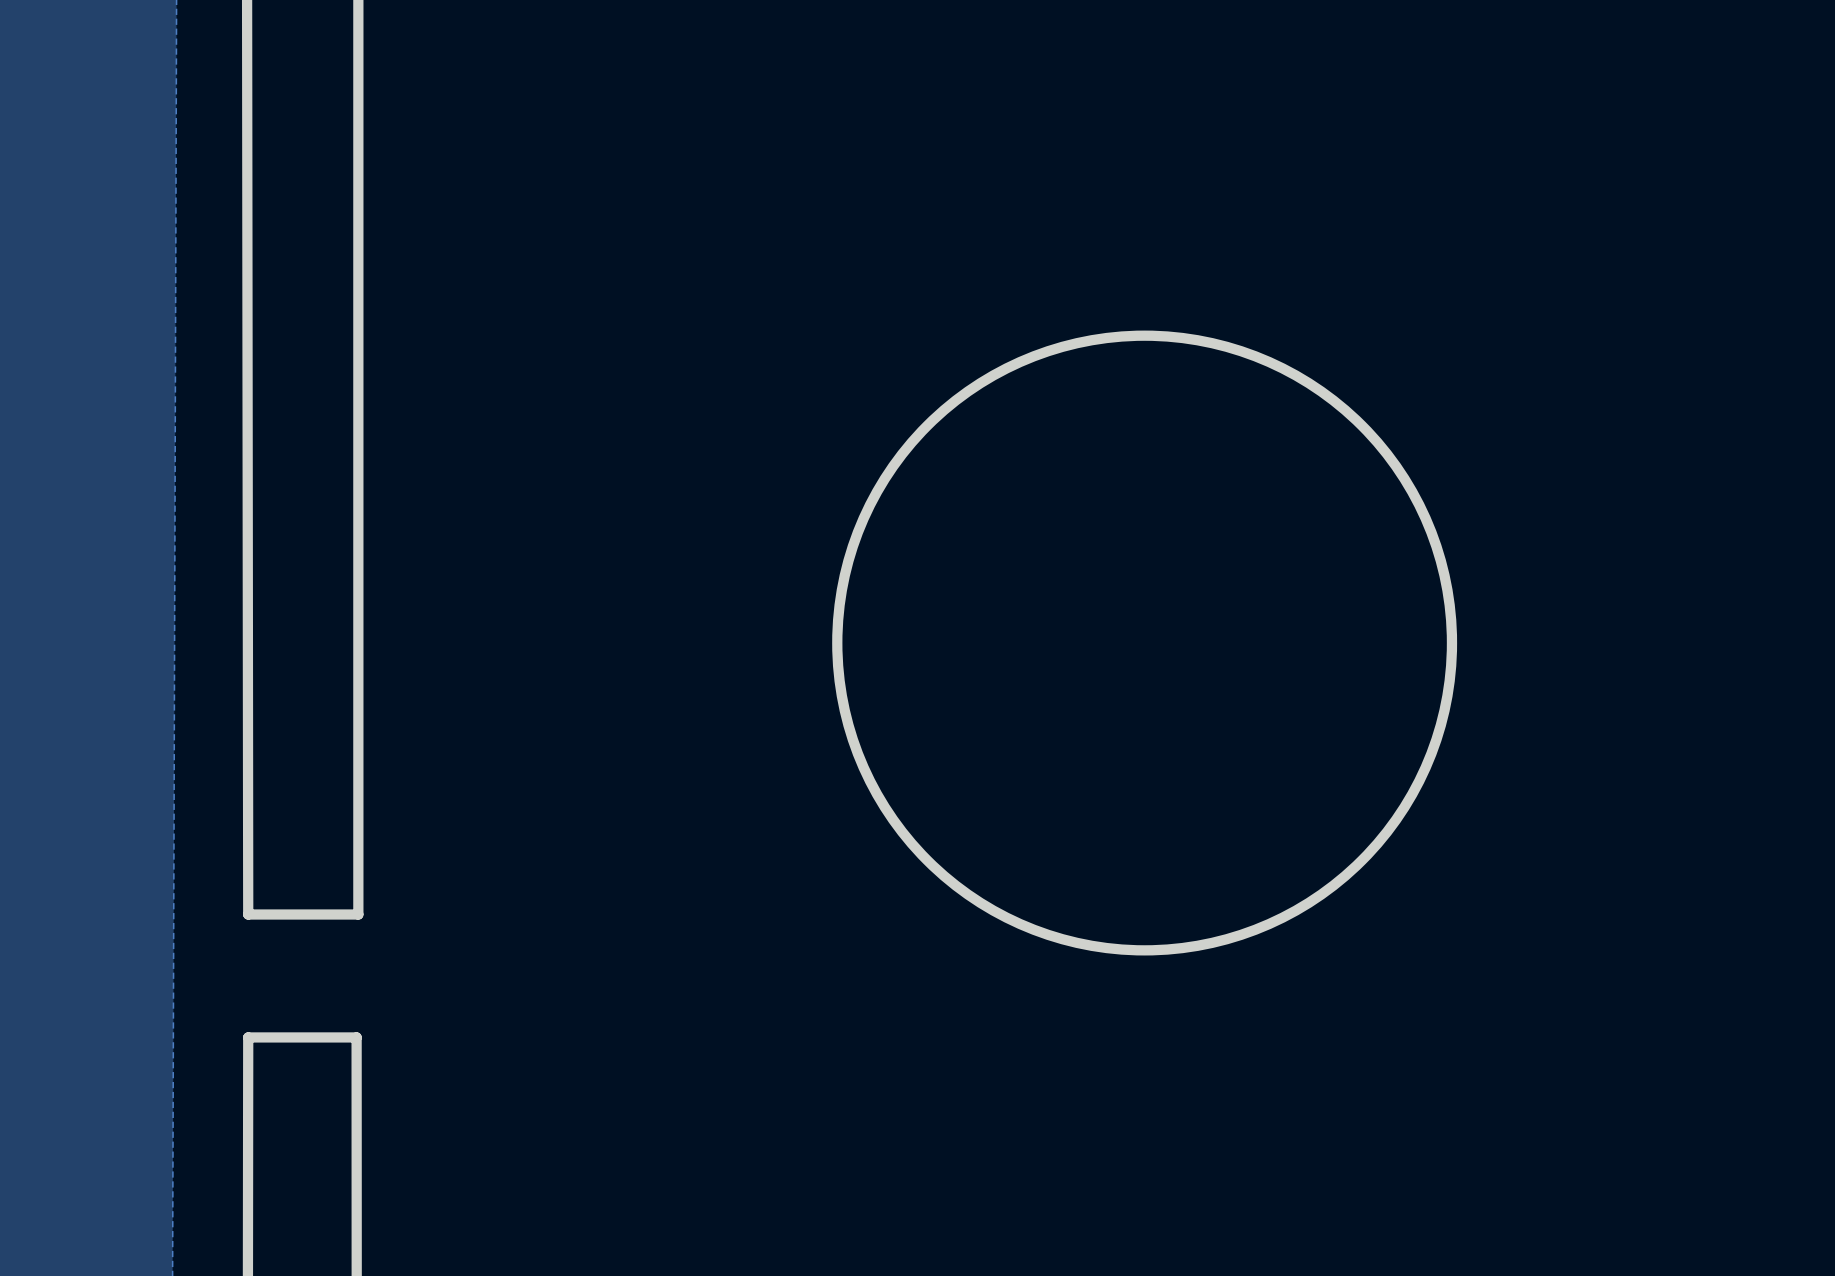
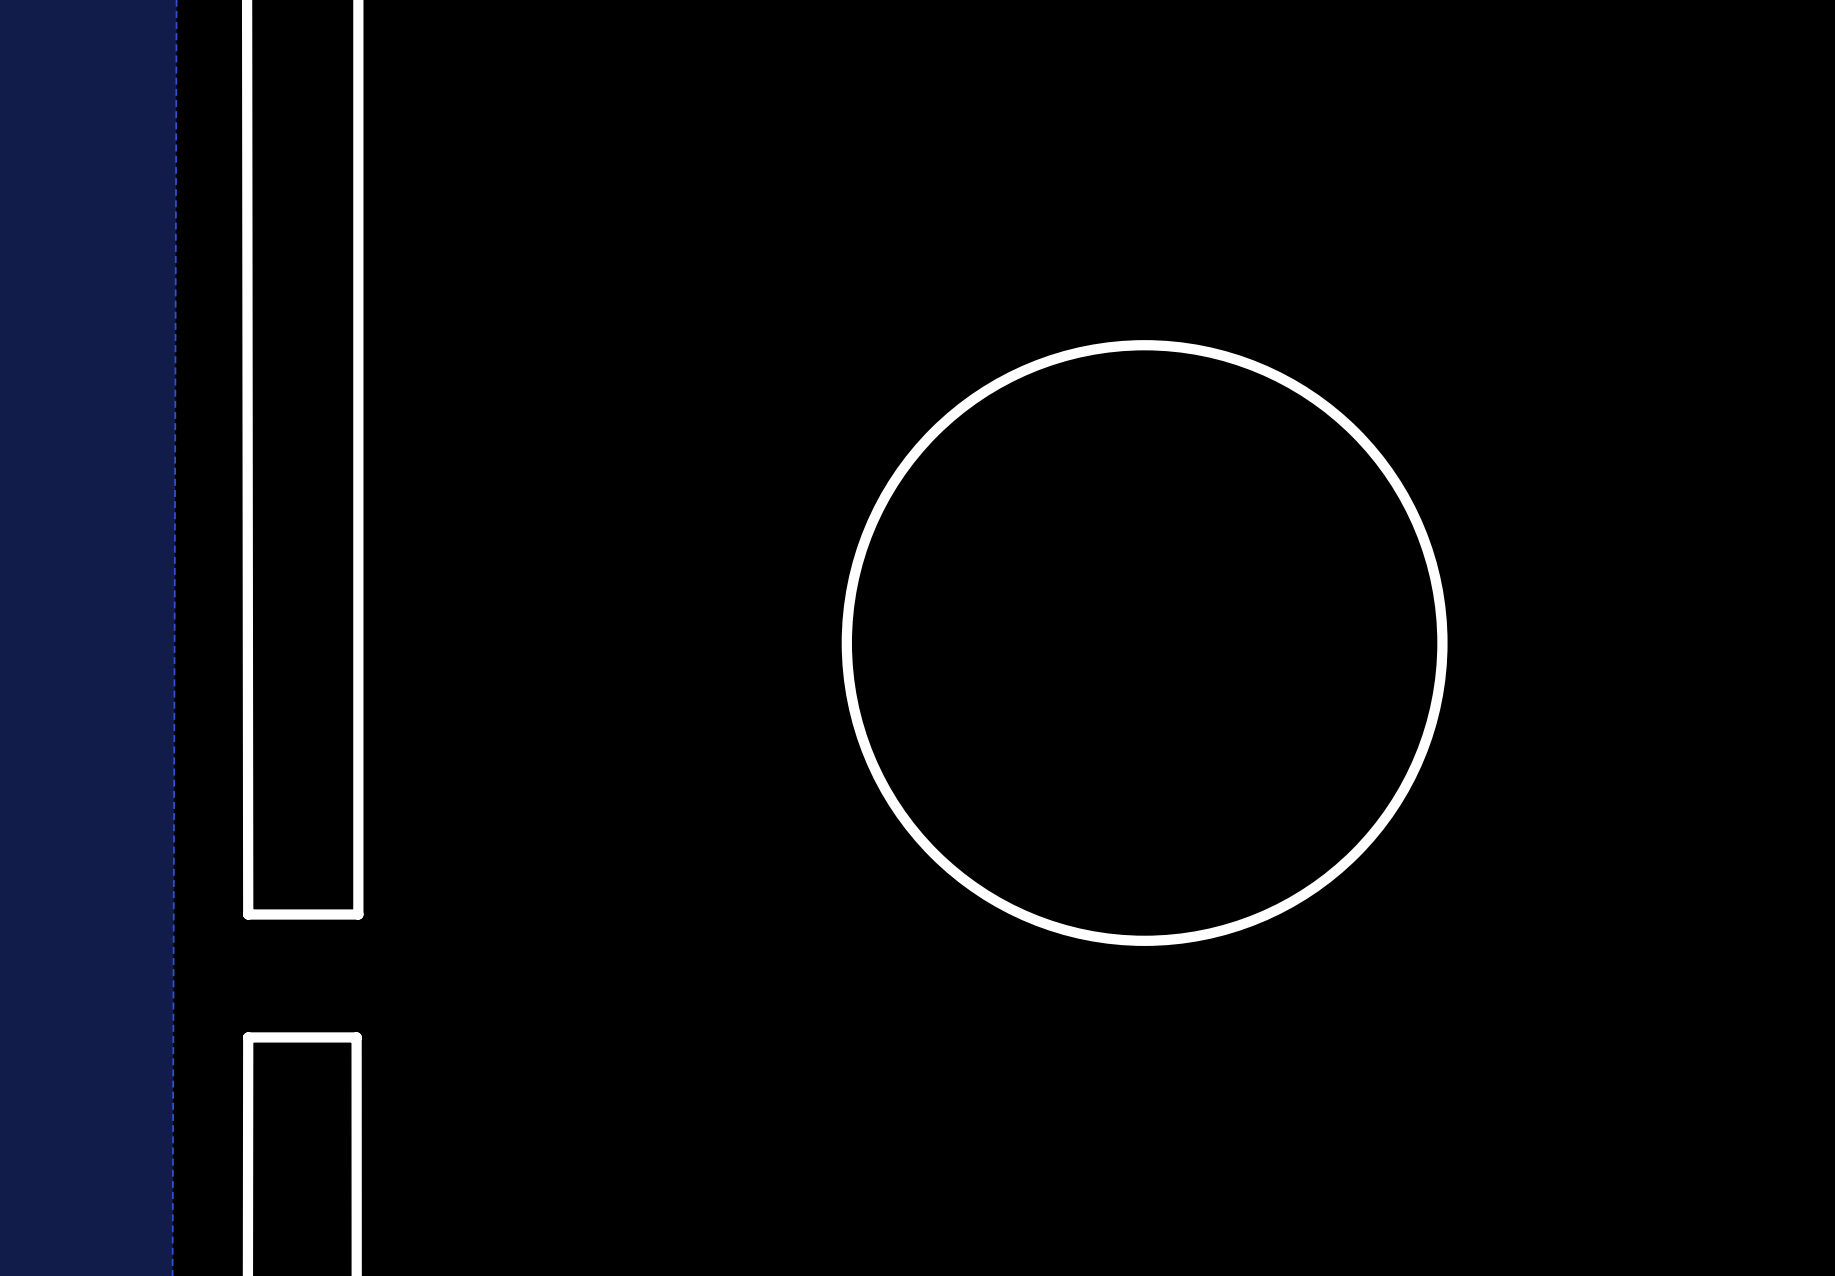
round board edge size: [832, 330, 1458, 956] -> [841, 340, 1448, 946]

